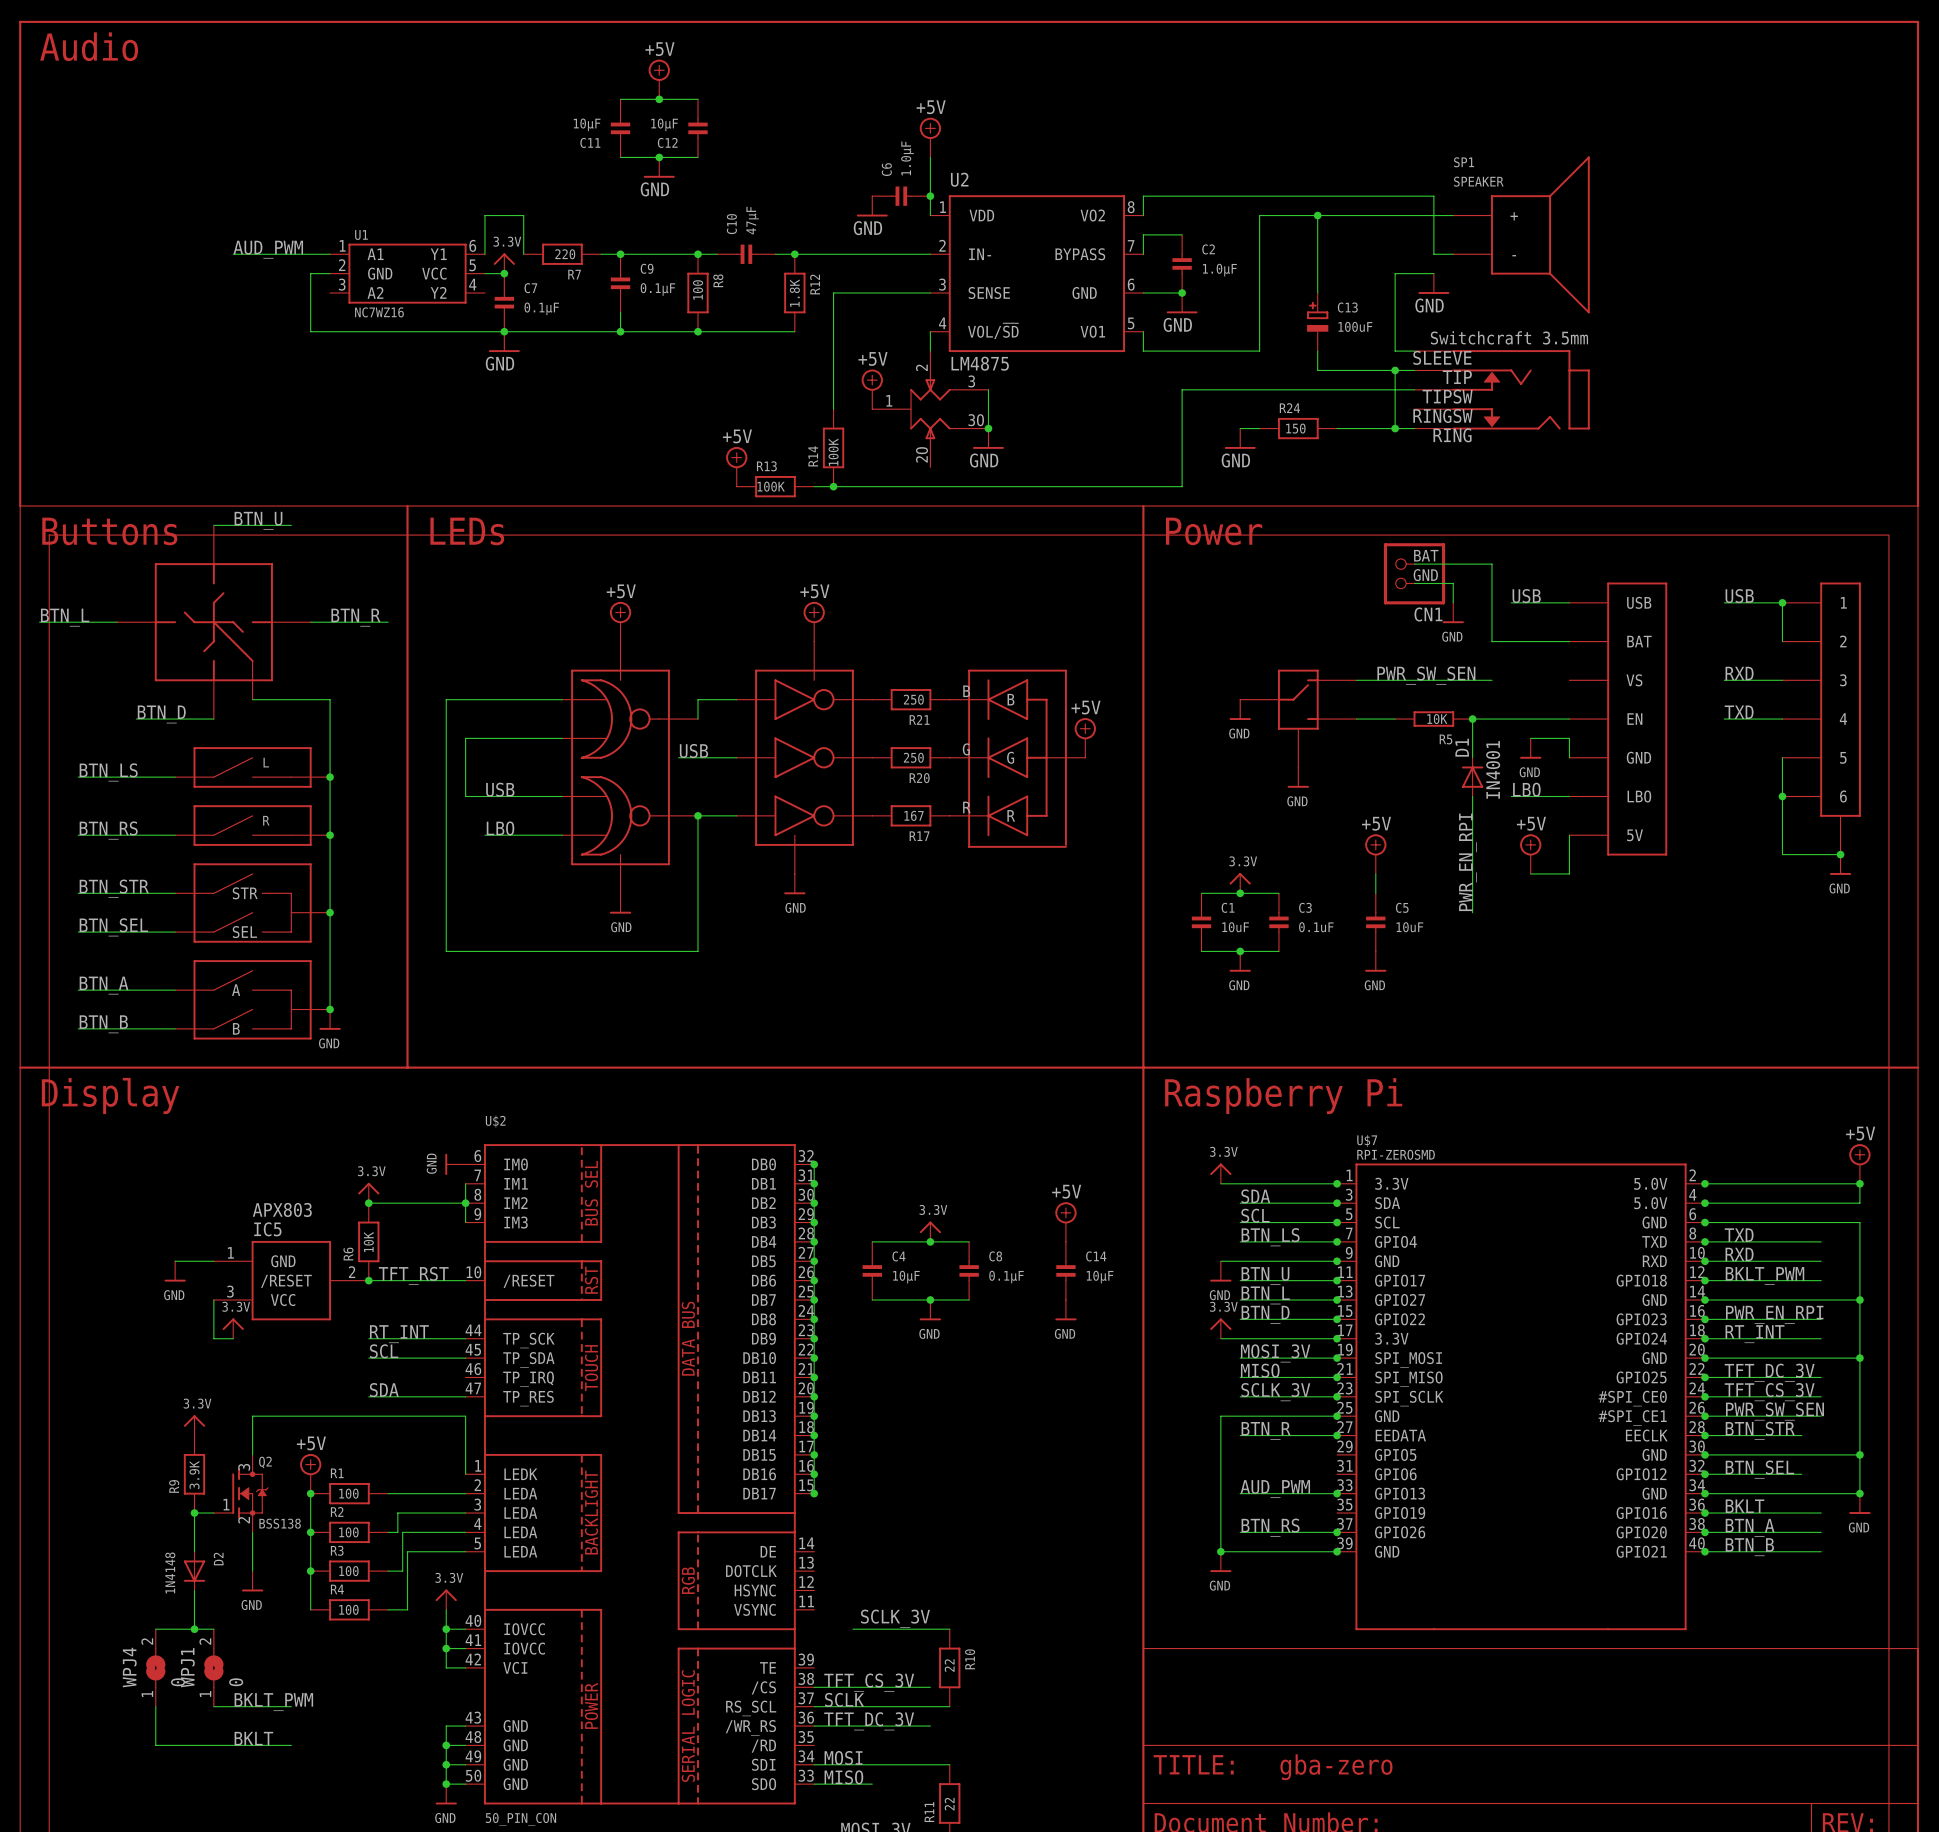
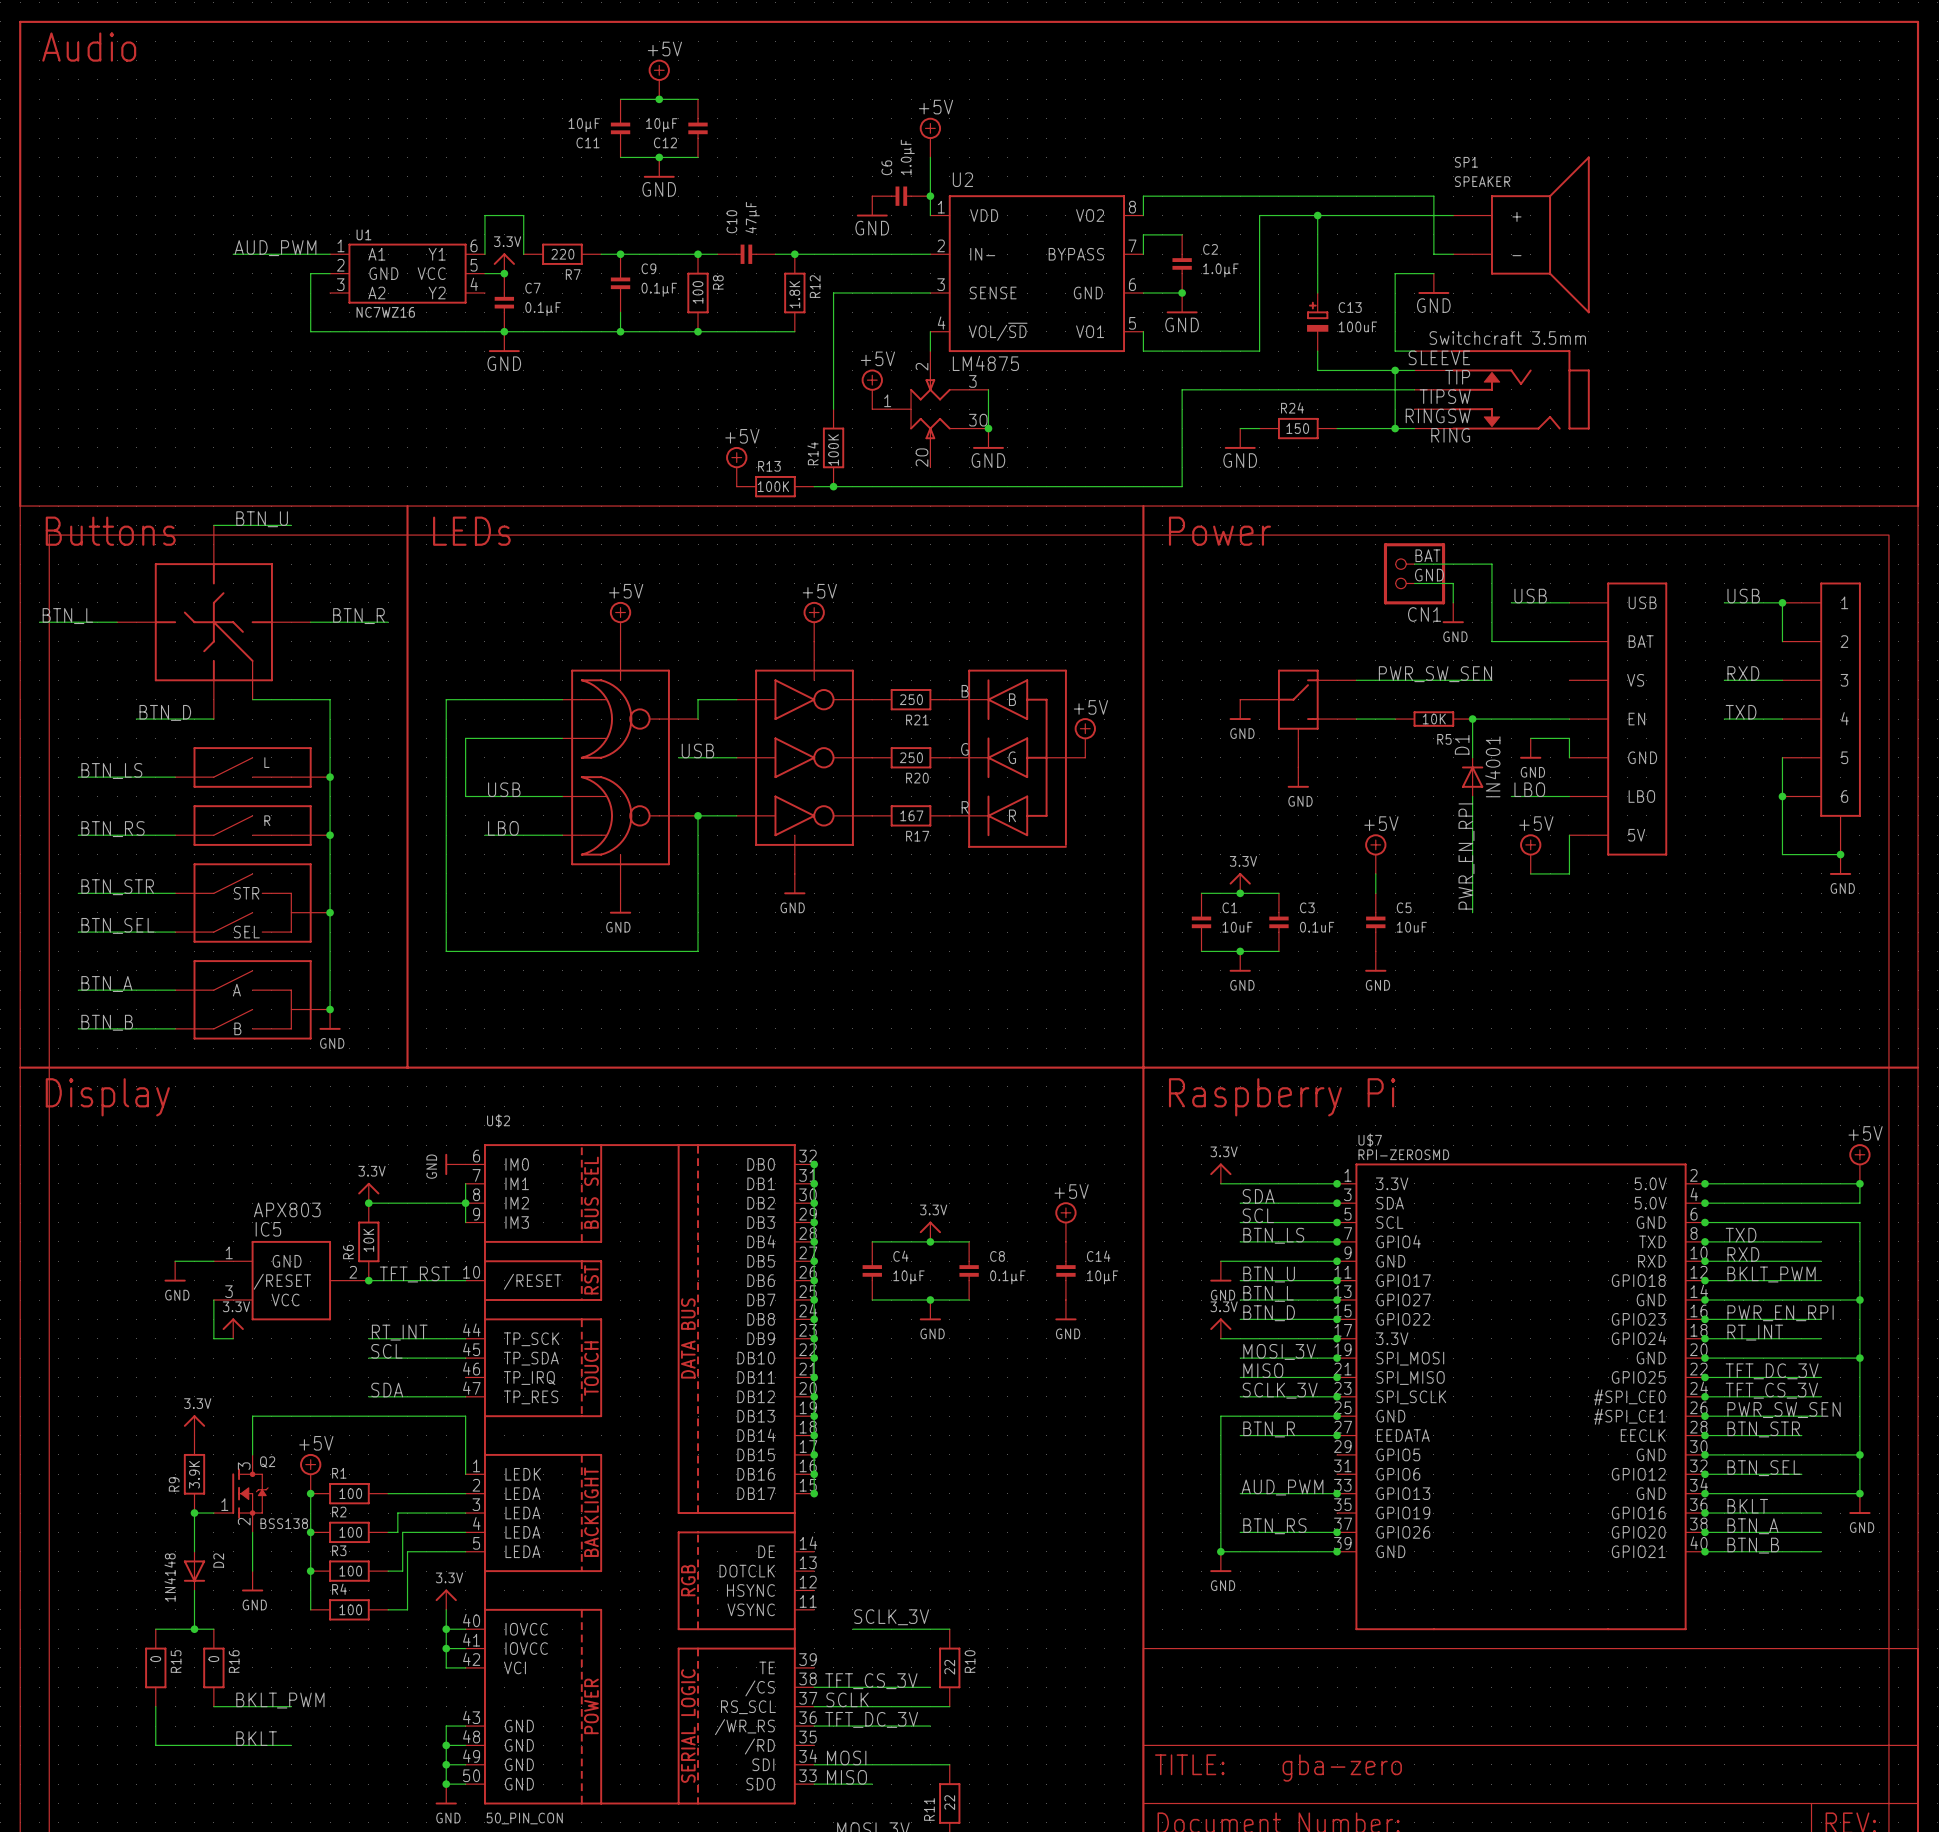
WPJ4: 0 (155, 1667) -> none
R15: none -> 0 (155, 1667)
WPJ1: 0 (213, 1667) -> none
R16: none -> 0 (213, 1667)

